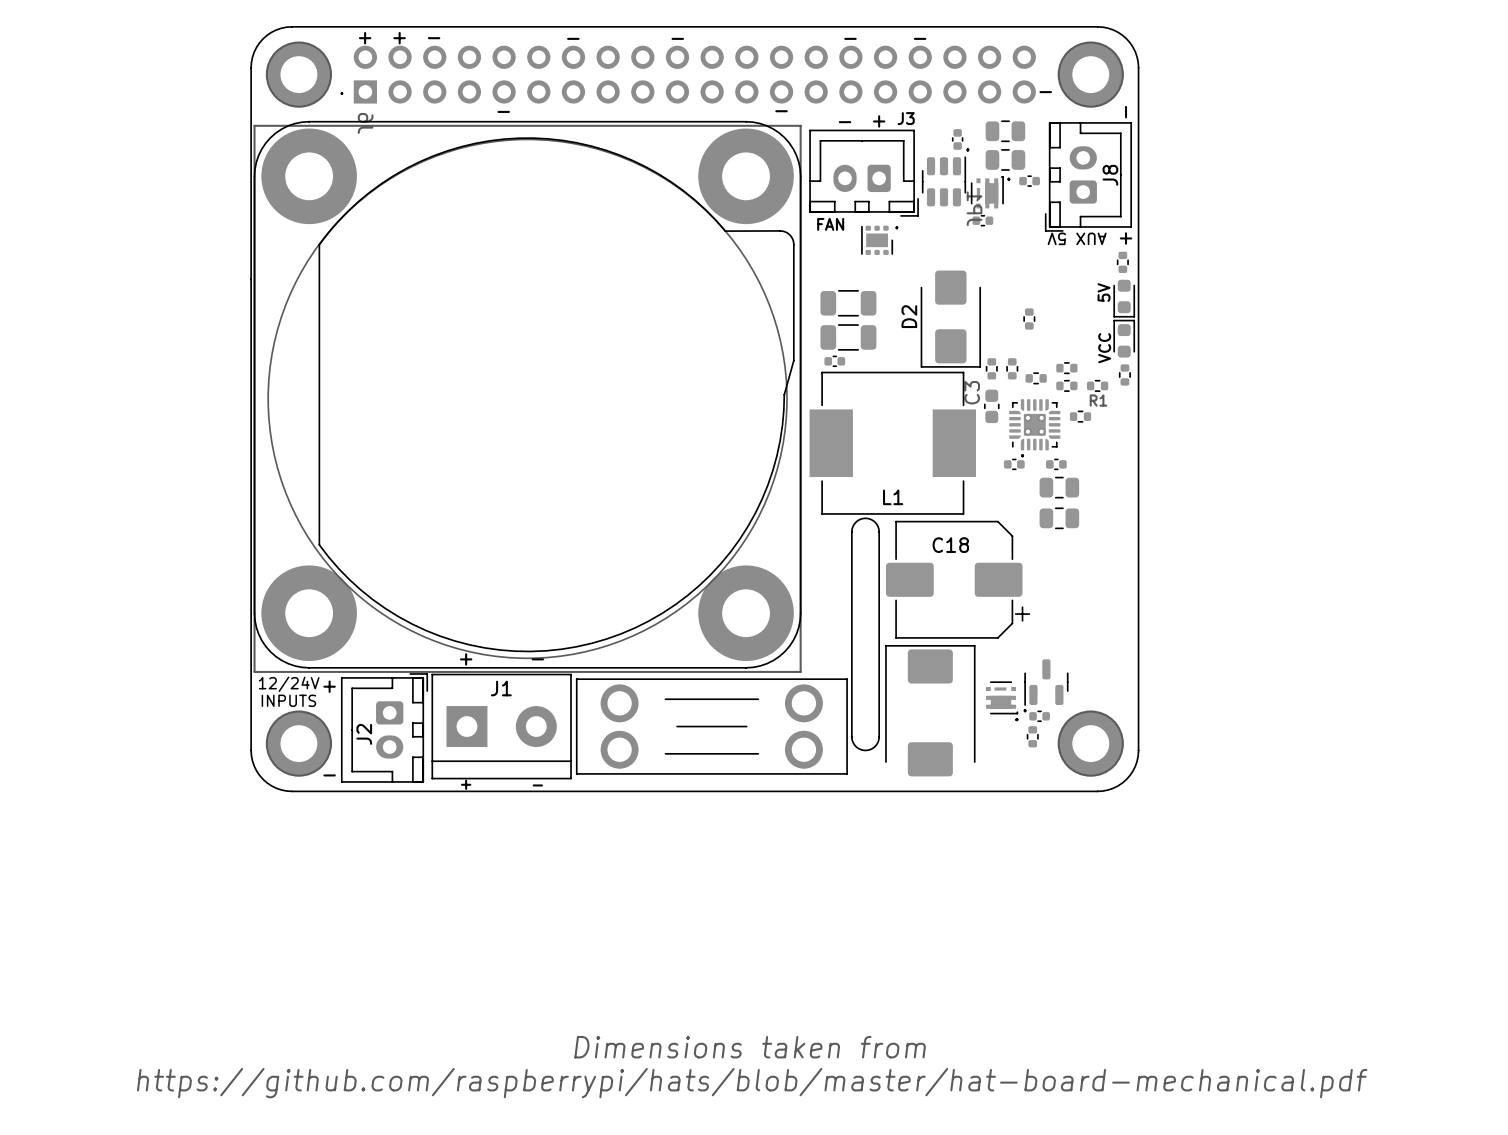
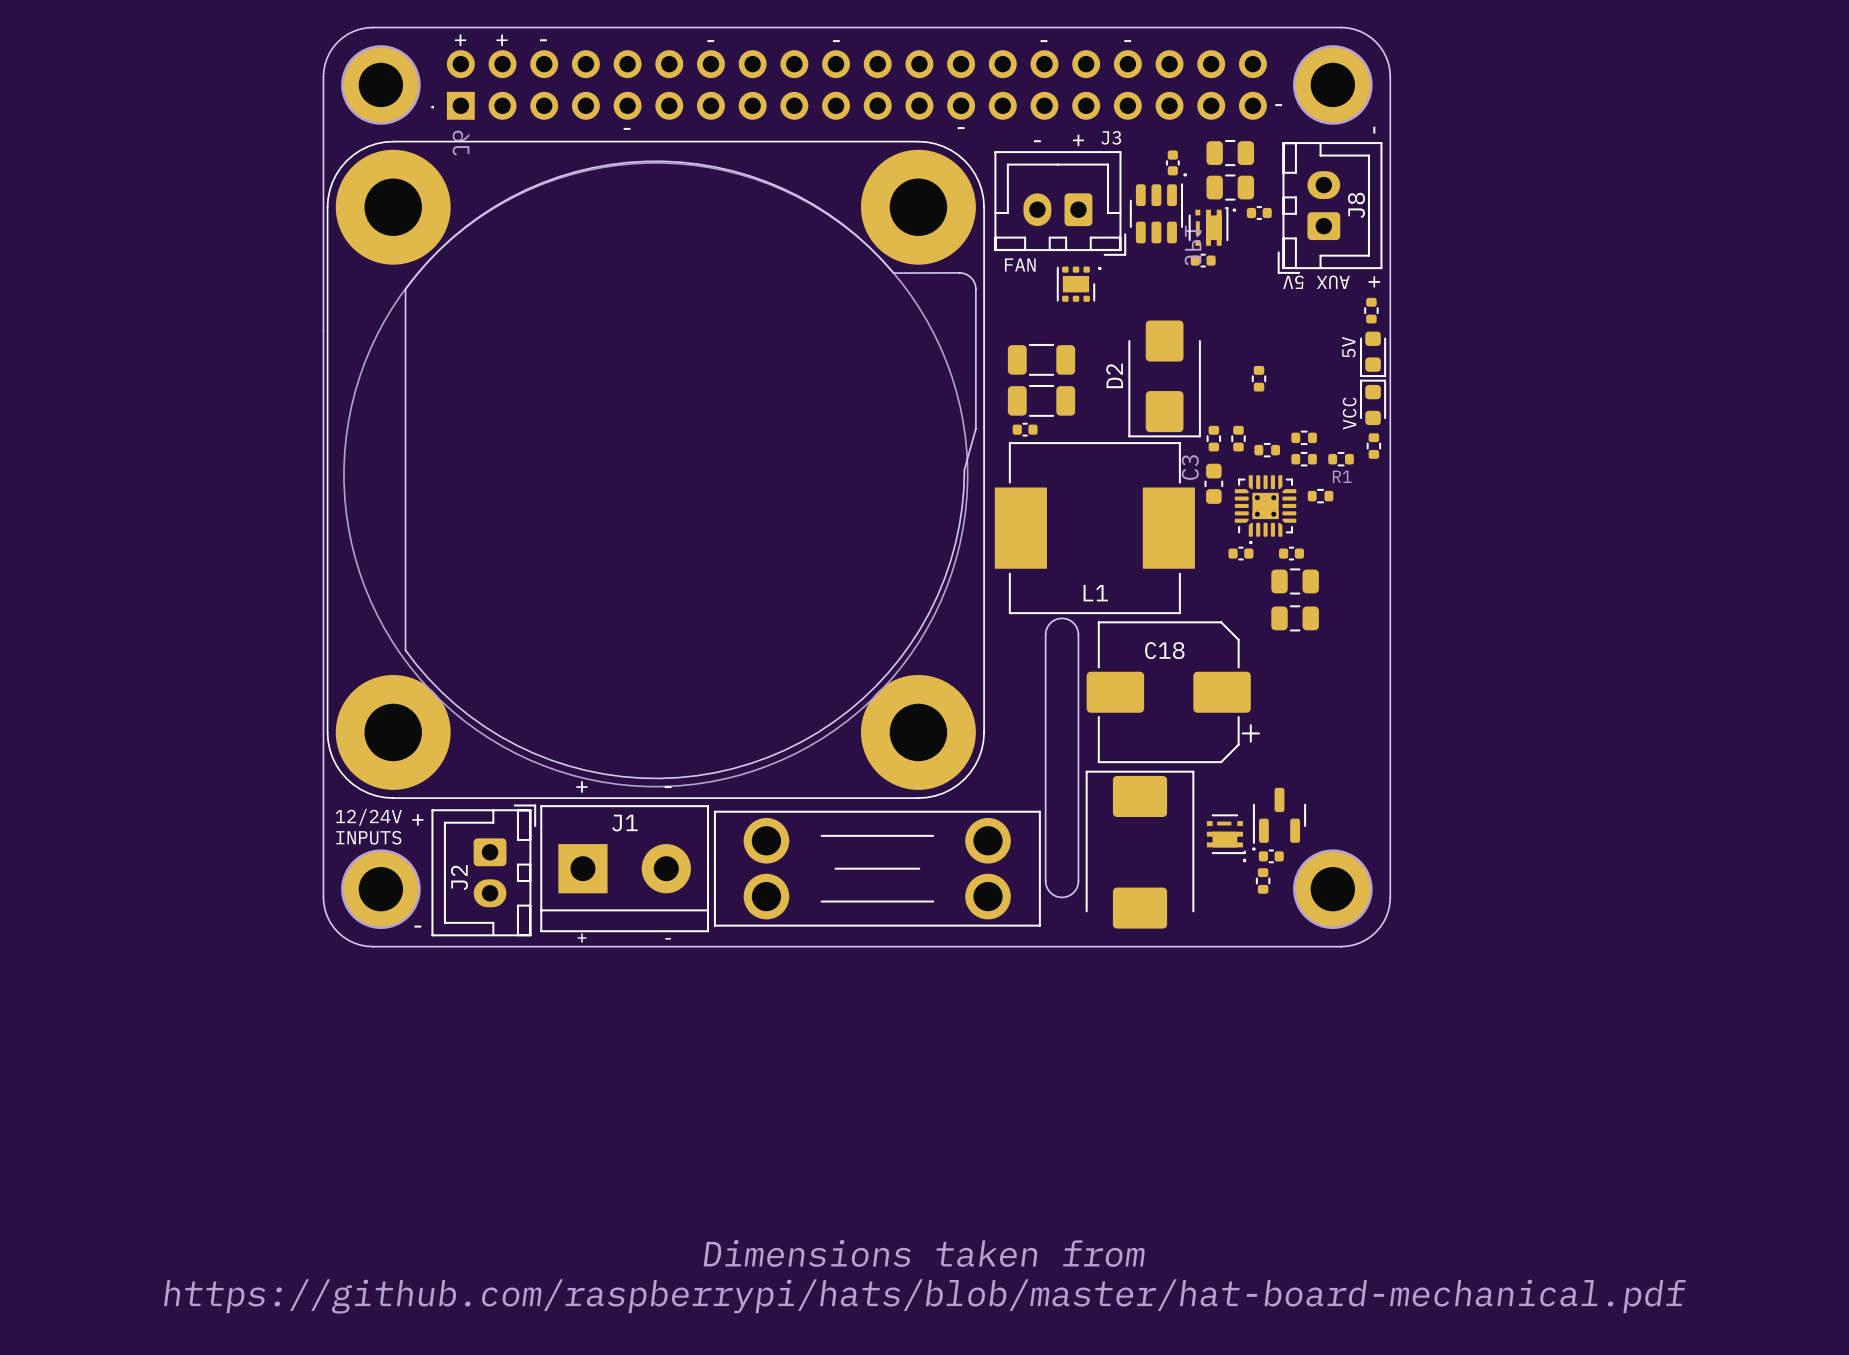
line: (254, 125) (800, 125) (800, 671) (254, 671) (254, 125) -> none

